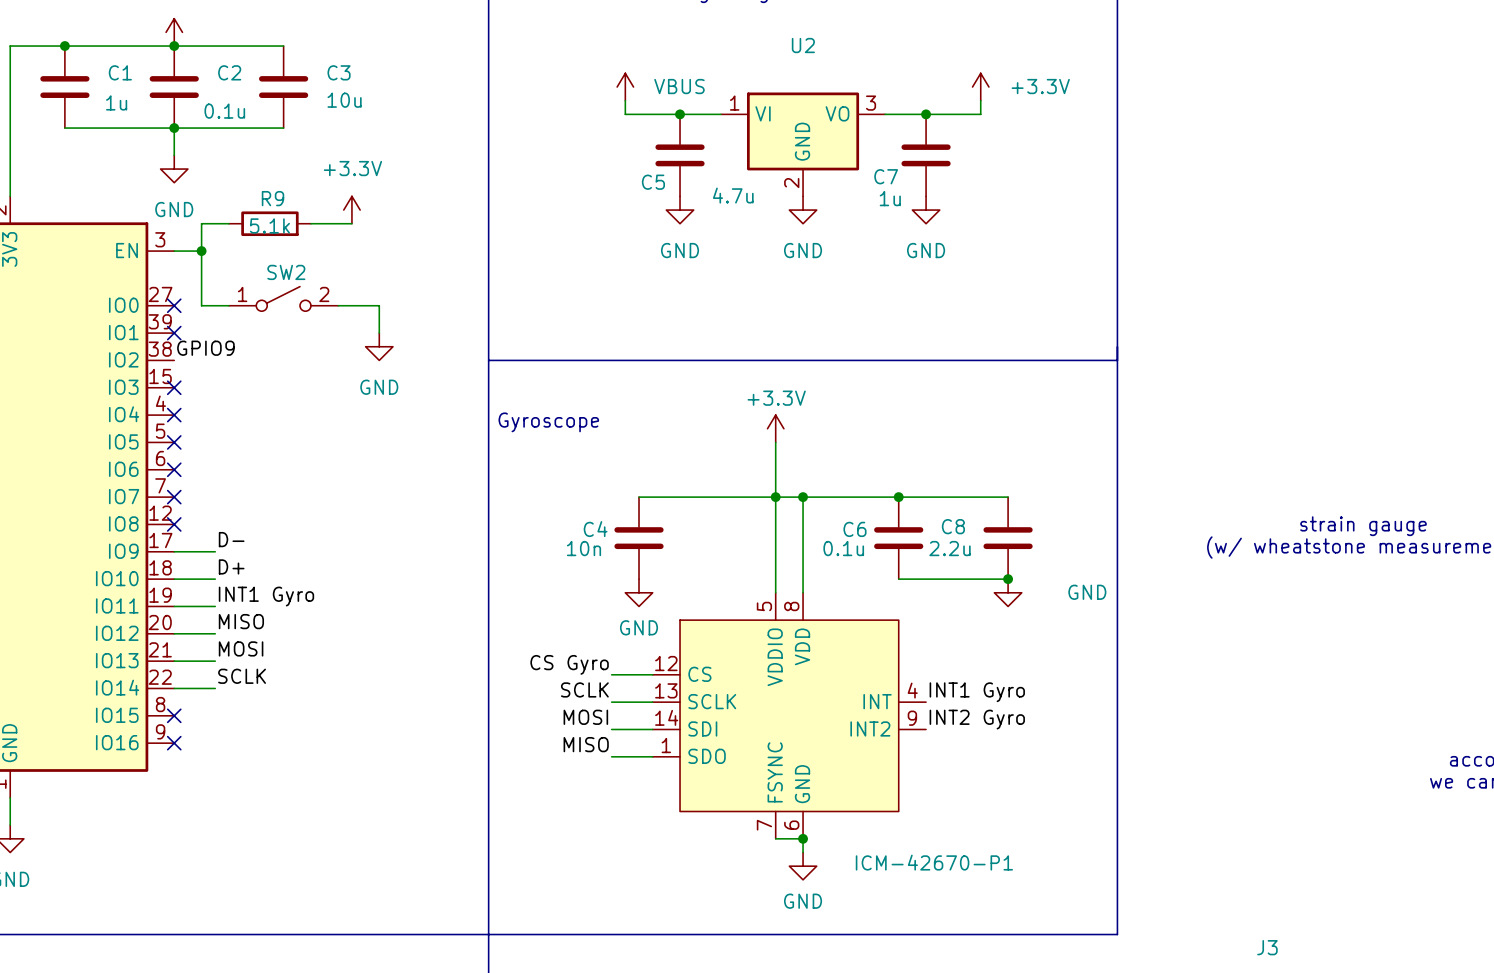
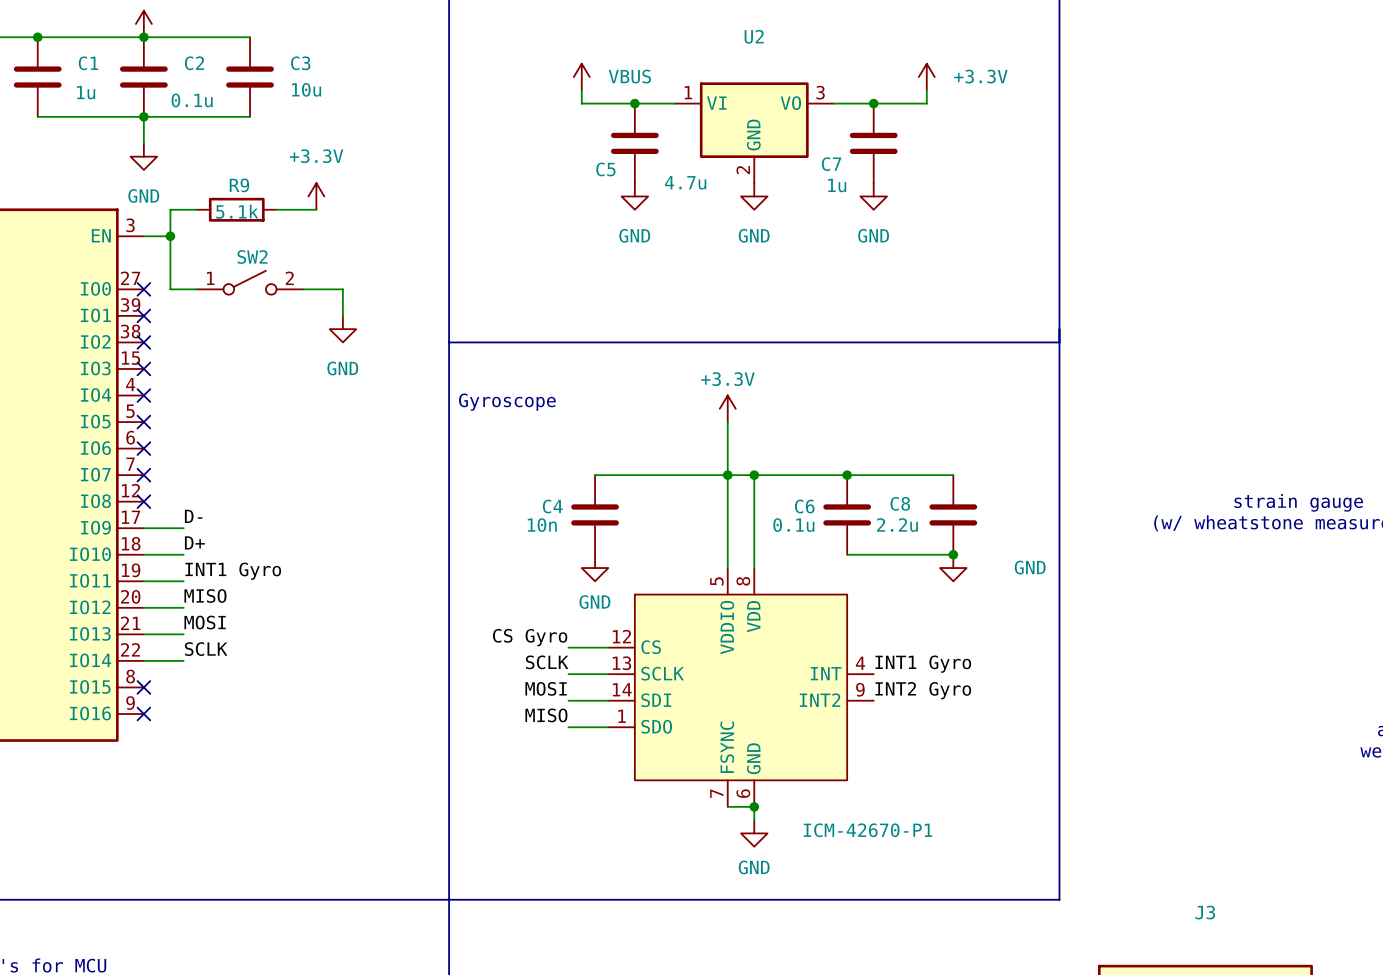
label: GPIO9 (205, 348) -> none
no-connect mark: none -> (143, 342)

